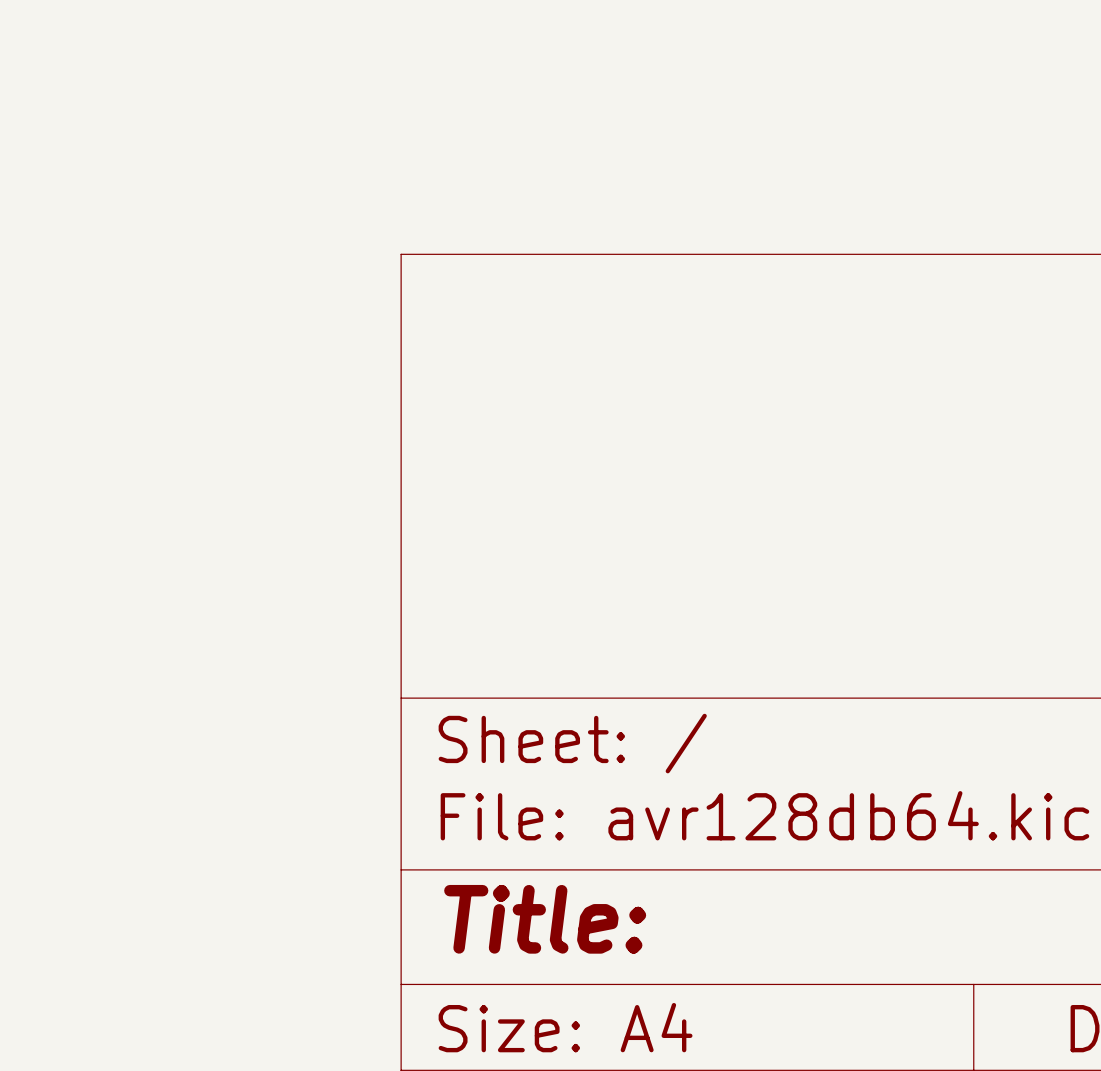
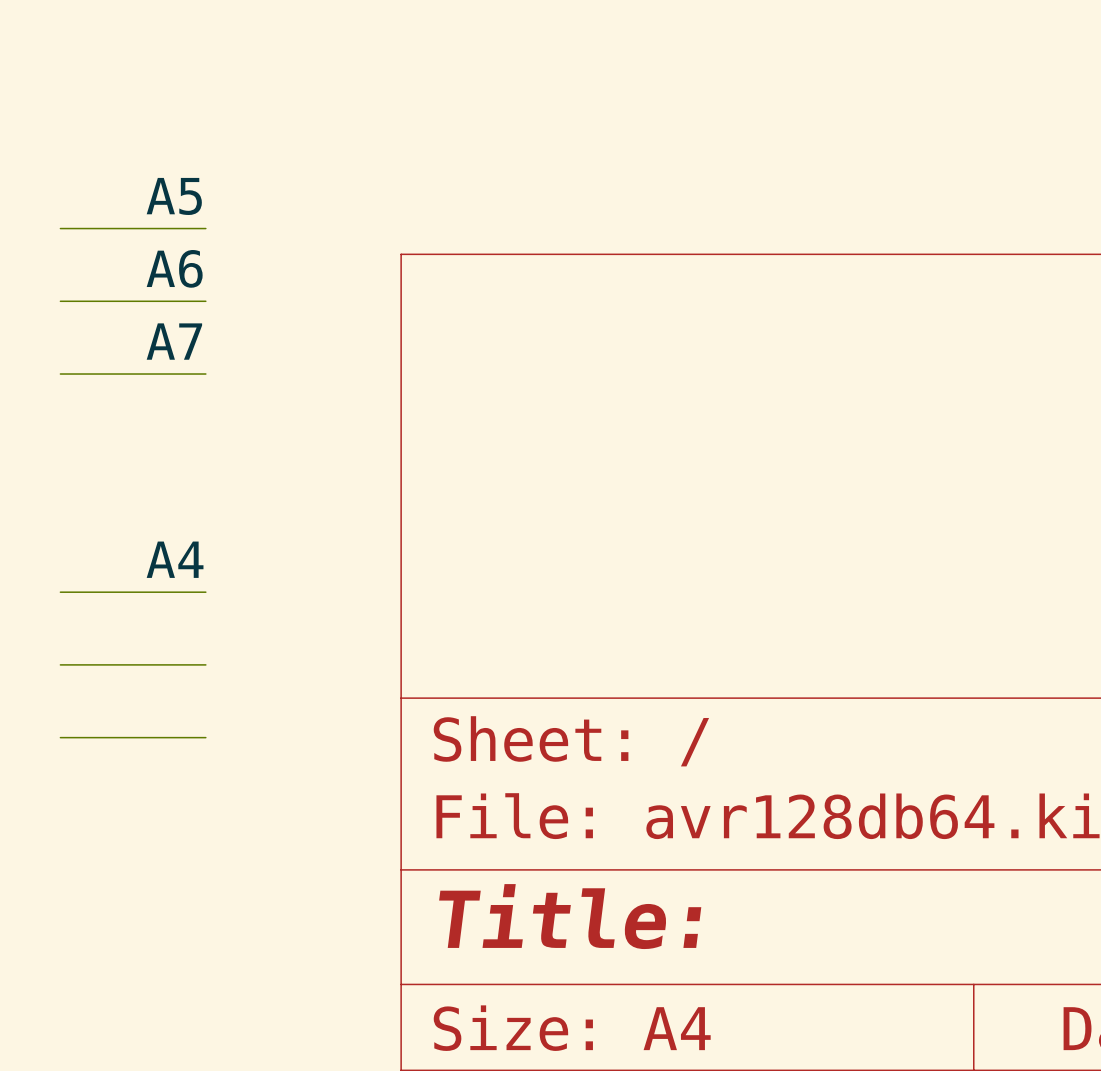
label: none -> A5 (174, 196)
wire: none -> (60, 228) (205, 228)
label: none -> A6 (174, 268)
wire: none -> (60, 301) (205, 301)
label: none -> A7 (174, 341)
wire: none -> (60, 374) (205, 374)
label: none -> A4 (175, 559)
wire: none -> (60, 592) (205, 592)
wire: none -> (60, 664) (205, 664)
wire: none -> (60, 737) (205, 737)

